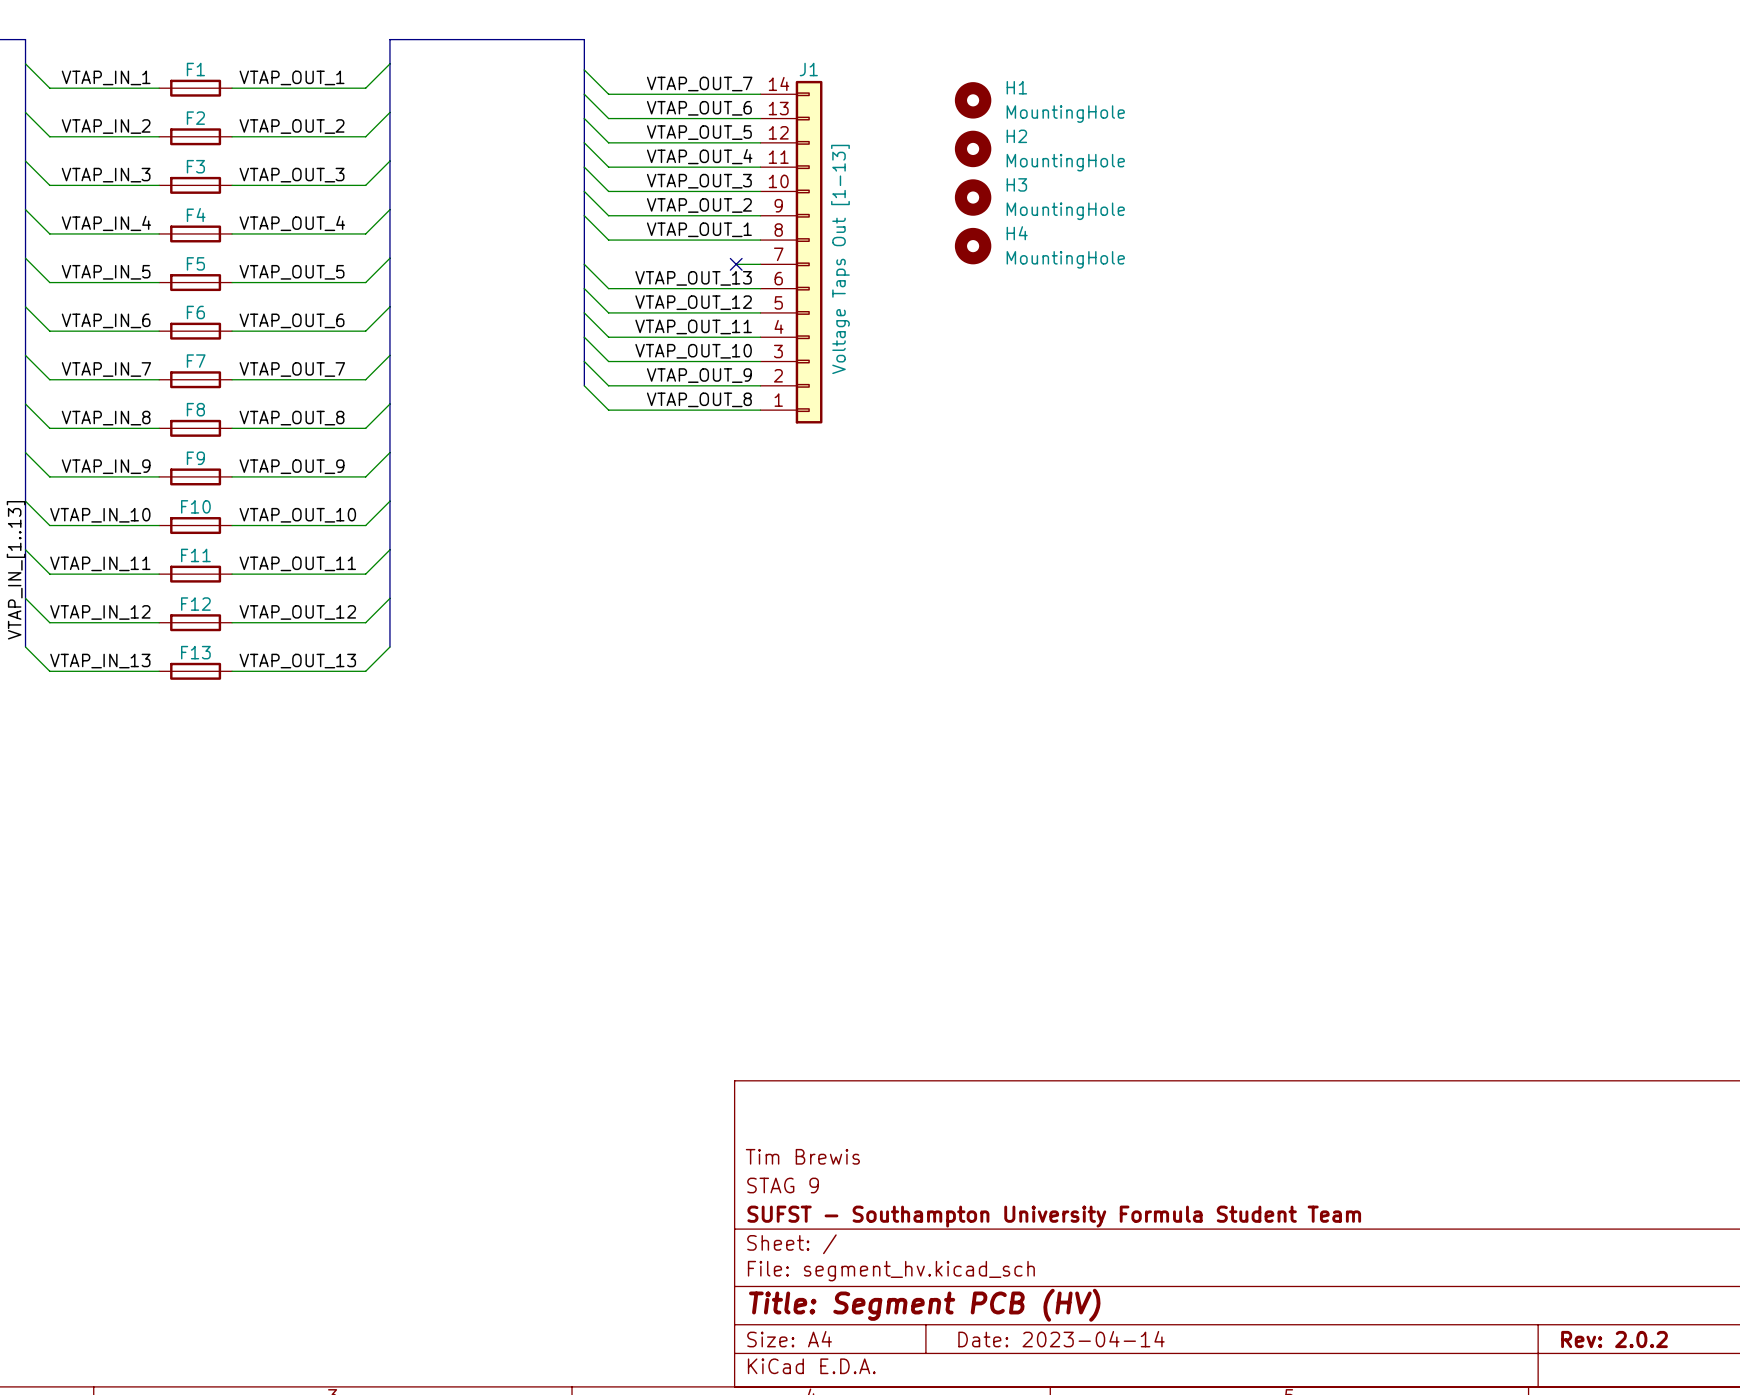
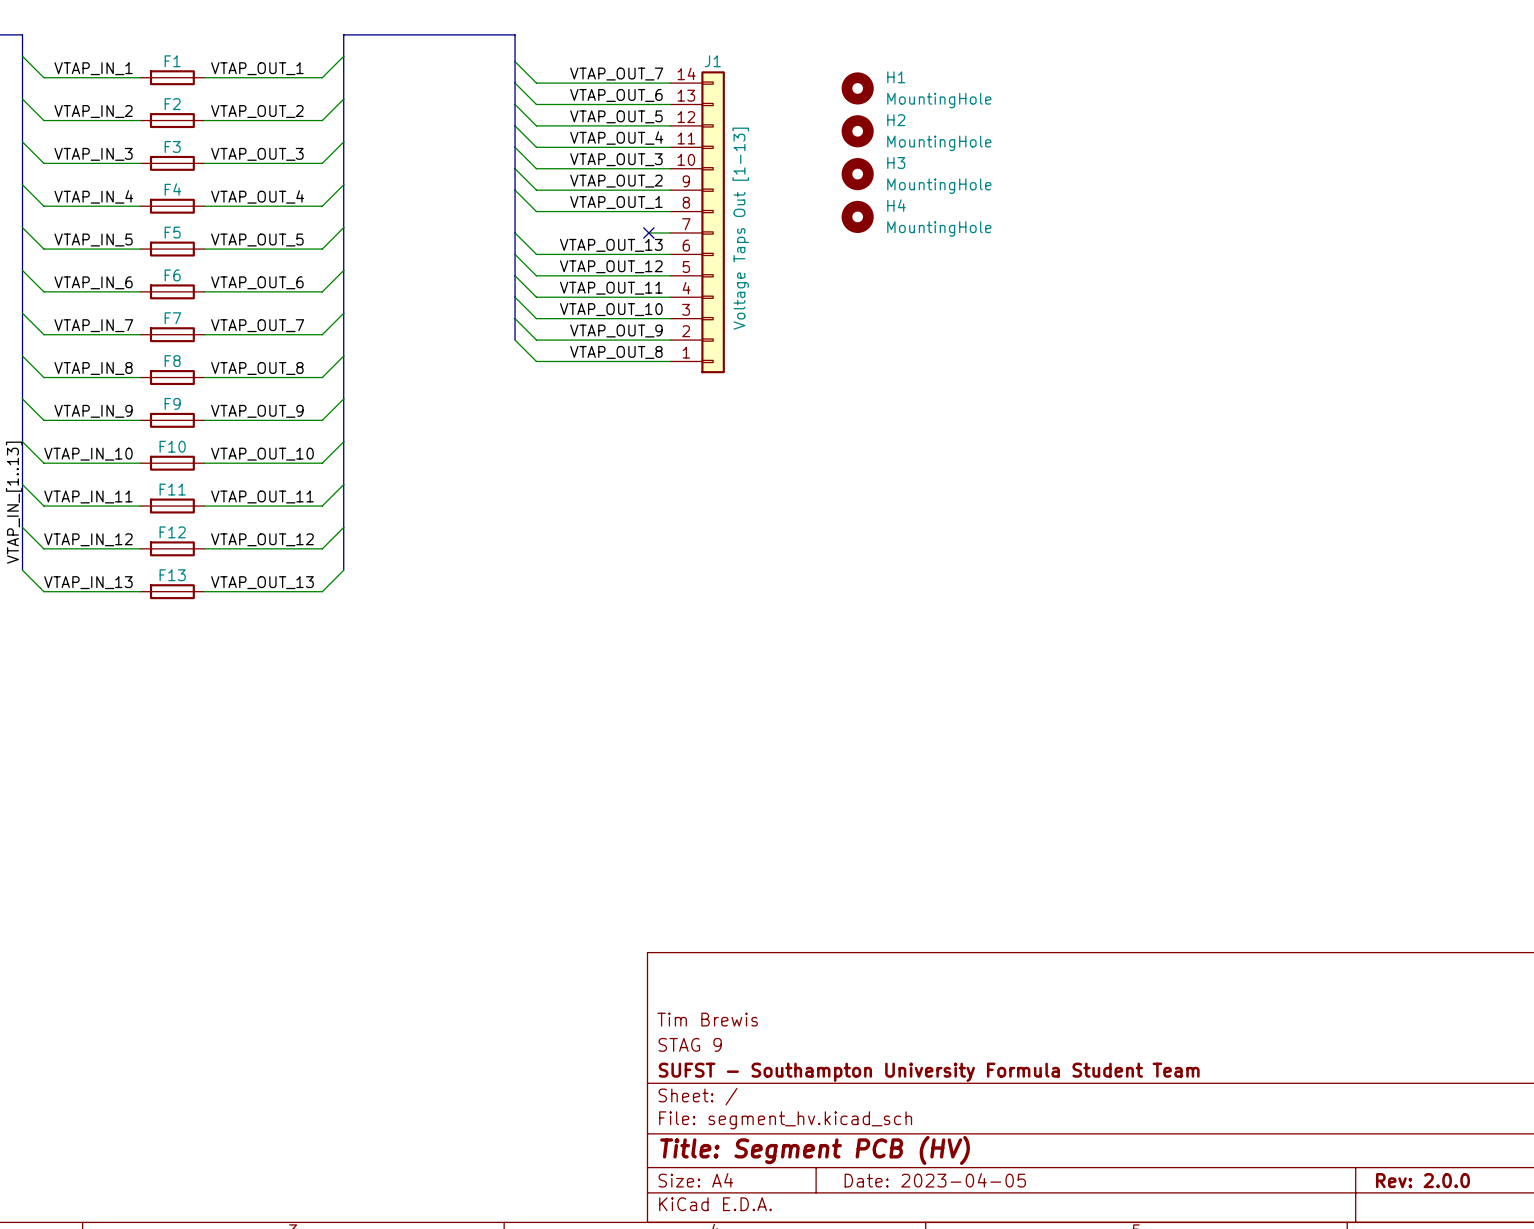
title block: Date: 2023-04-14 (1061, 1339) -> Date: 2023-04-05 (935, 1180)
title block: Rev: 2.0.2 (1614, 1339) -> Rev: 2.0.0 (1422, 1180)

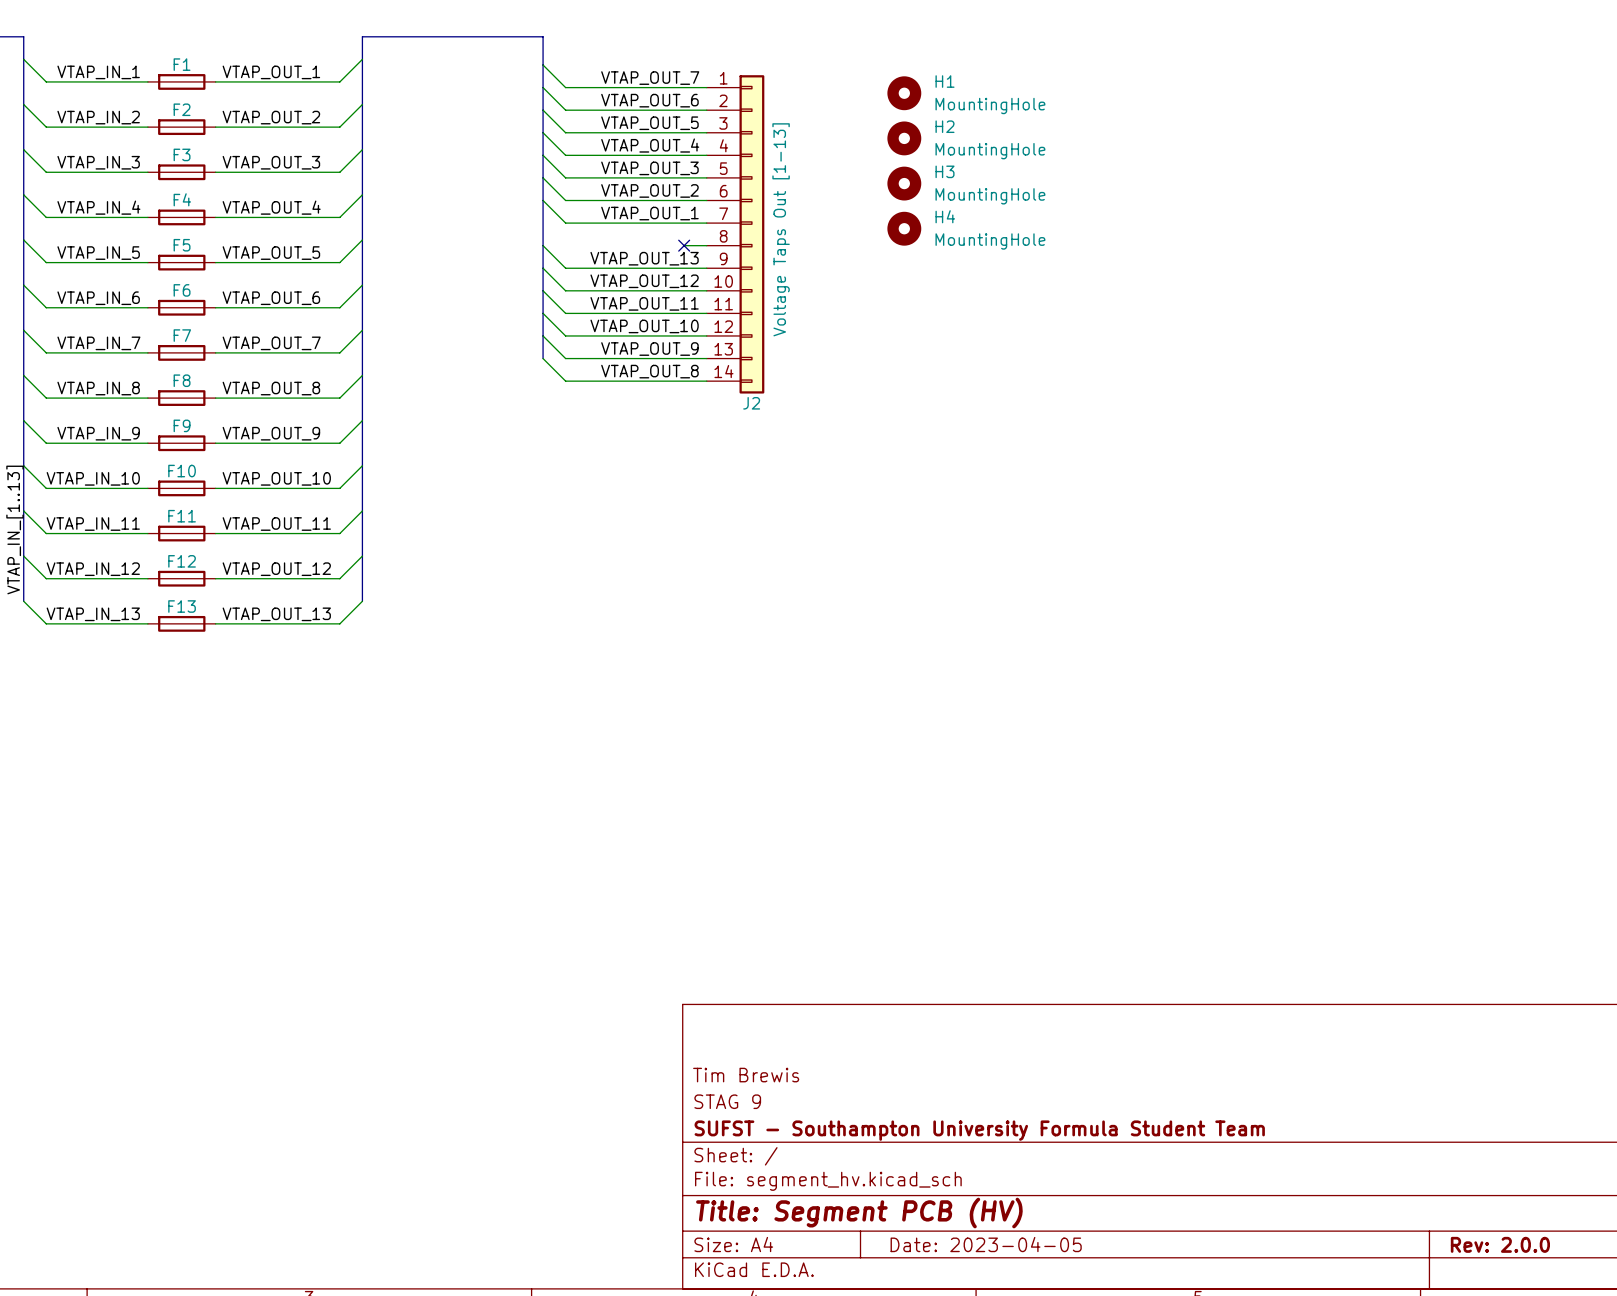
J1 name: J1 (712, 61) -> J2 (751, 403)
J1 flip: as is (713, 222) -> up-down (751, 234)

